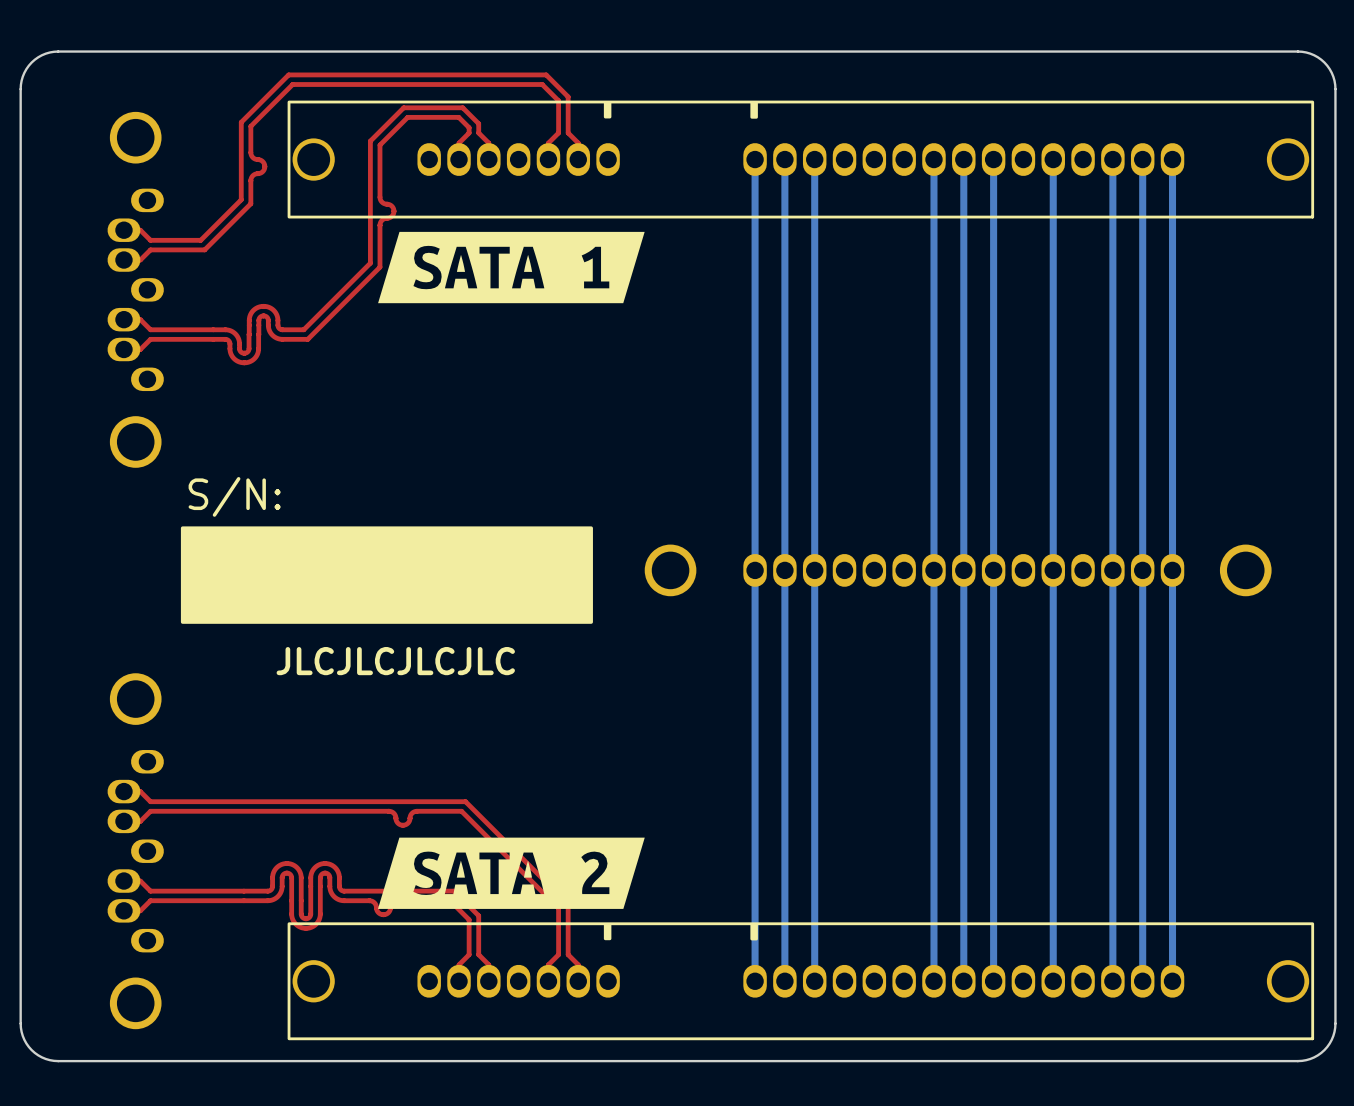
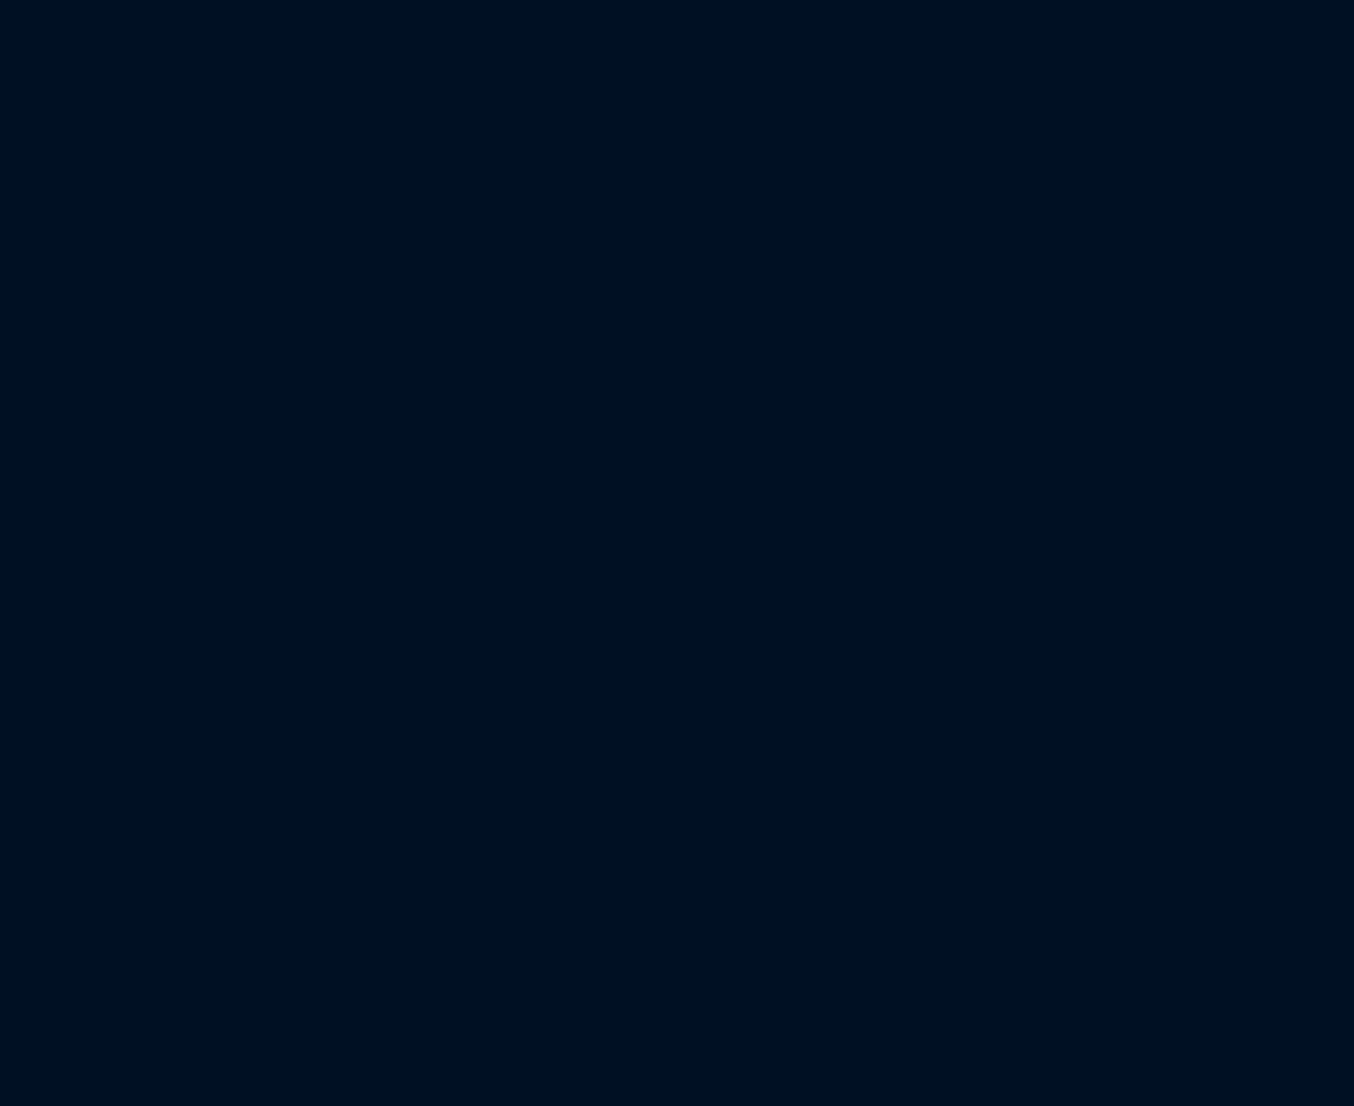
board edge: (1297, 51) (58, 51) (45, 53) (34, 59) (24, 72) (20, 89) (20, 1023) (22, 1035) (28, 1046) (41, 1057) (58, 1061) (1297, 1061) (1310, 1058) (1321, 1052) (1331, 1039) (1335, 1023) (1335, 89) (1333, 76) (1324, 62) (1314, 55) (1297, 51) -> none
top track: (459, 159) (459, 143) (469, 132) (469, 127) (458, 117) (407, 117) (379, 145) (380, 198) (383, 203) (391, 206) (393, 211) (391, 216) (383, 219) (380, 223) (379, 267) (307, 339) (276, 337) (270, 332) (268, 318) (263, 315) -> none
top track: (488, 159) (488, 143) (478, 132) (478, 123) (462, 107) (403, 107) (370, 141) (370, 263) (303, 329) (280, 329) (274, 311) (263, 306) -> none
top track: (548, 159) (548, 143) (558, 132) (558, 100) (542, 84) (292, 84) (250, 126) (251, 154) (254, 158) (262, 161) (264, 166) (262, 172) (254, 174) (251, 178) (250, 203) (204, 249) (150, 249) (140, 260) (123, 260) -> none
top track: (578, 159) (578, 143) (568, 132) (568, 96) (546, 74) (288, 74) (241, 122) (241, 199) (200, 240) (150, 240) (140, 230) (123, 230) -> none
bottom track: (755, 159) (755, 981) -> none
bottom track: (784, 159) (784, 981) -> none
part: (800, 159) -> none
bottom track: (814, 159) (814, 981) -> none
bottom track: (933, 159) (933, 981) -> none
bottom track: (963, 159) (963, 981) -> none
bottom track: (993, 159) (993, 981) -> none
bottom track: (1053, 159) (1053, 981) -> none
bottom track: (1112, 159) (1112, 981) -> none
bottom track: (1142, 159) (1142, 981) -> none
bottom track: (1172, 159) (1172, 981) -> none
drawing: [378, 231, 645, 304] -> none
part: (135, 289) -> none
top track: (263, 306) (255, 308) (250, 314) (249, 334) -> none
top track: (263, 315) (258, 319) (257, 353) (252, 360) (244, 362) -> none
top track: (123, 319) (140, 319) (150, 329) (228, 330) (237, 336) (239, 350) (244, 353) -> none
top track: (249, 334) (248, 349) (244, 353) -> none
top track: (123, 349) (140, 349) (150, 339) (225, 339) (229, 342) (233, 357) (244, 362) -> none
text: S/N: (234, 496) -> none
drawing: [180, 526, 593, 624] -> none
part: (958, 570) -> none
text: JLCJLCJLCJLC (395, 661) -> none
top track: (123, 791) (140, 791) (150, 801) (465, 801) (568, 904) (568, 954) (578, 964) (578, 981) -> none
top track: (123, 821) (140, 821) (150, 811) (388, 811) (394, 813) (397, 823) (402, 825) -> none
top track: (403, 825) (407, 823) (411, 814) (415, 811) (461, 811) (558, 908) (558, 954) (548, 964) (548, 981) -> none
drawing: [377, 837, 645, 909] -> none
part: (135, 851) -> none
top track: (123, 881) (140, 881) (150, 891) (268, 891) (272, 887) (272, 875) (275, 869) (283, 863) (290, 863) (297, 867) (300, 874) (301, 914) (305, 918) (310, 914) (311, 874) (314, 867) (323, 863) (330, 864) (336, 869) (339, 875) (339, 887) (342, 890) (454, 891) (478, 915) (478, 954) (488, 964) (488, 981) -> none
top track: (123, 910) (140, 910) (150, 900) (271, 900) (280, 893) (282, 876) (287, 873) (291, 877) (292, 919) (298, 926) (307, 928) (316, 924) (319, 917) (320, 877) (325, 873) (329, 876) (330, 890) (335, 897) (342, 900) (371, 901) (375, 904) (377, 912) (383, 914) -> none
top track: (383, 914) (388, 912) (391, 904) (395, 900) (450, 900) (469, 919) (469, 954) (459, 964) (459, 981) -> none
part: (800, 981) -> none

